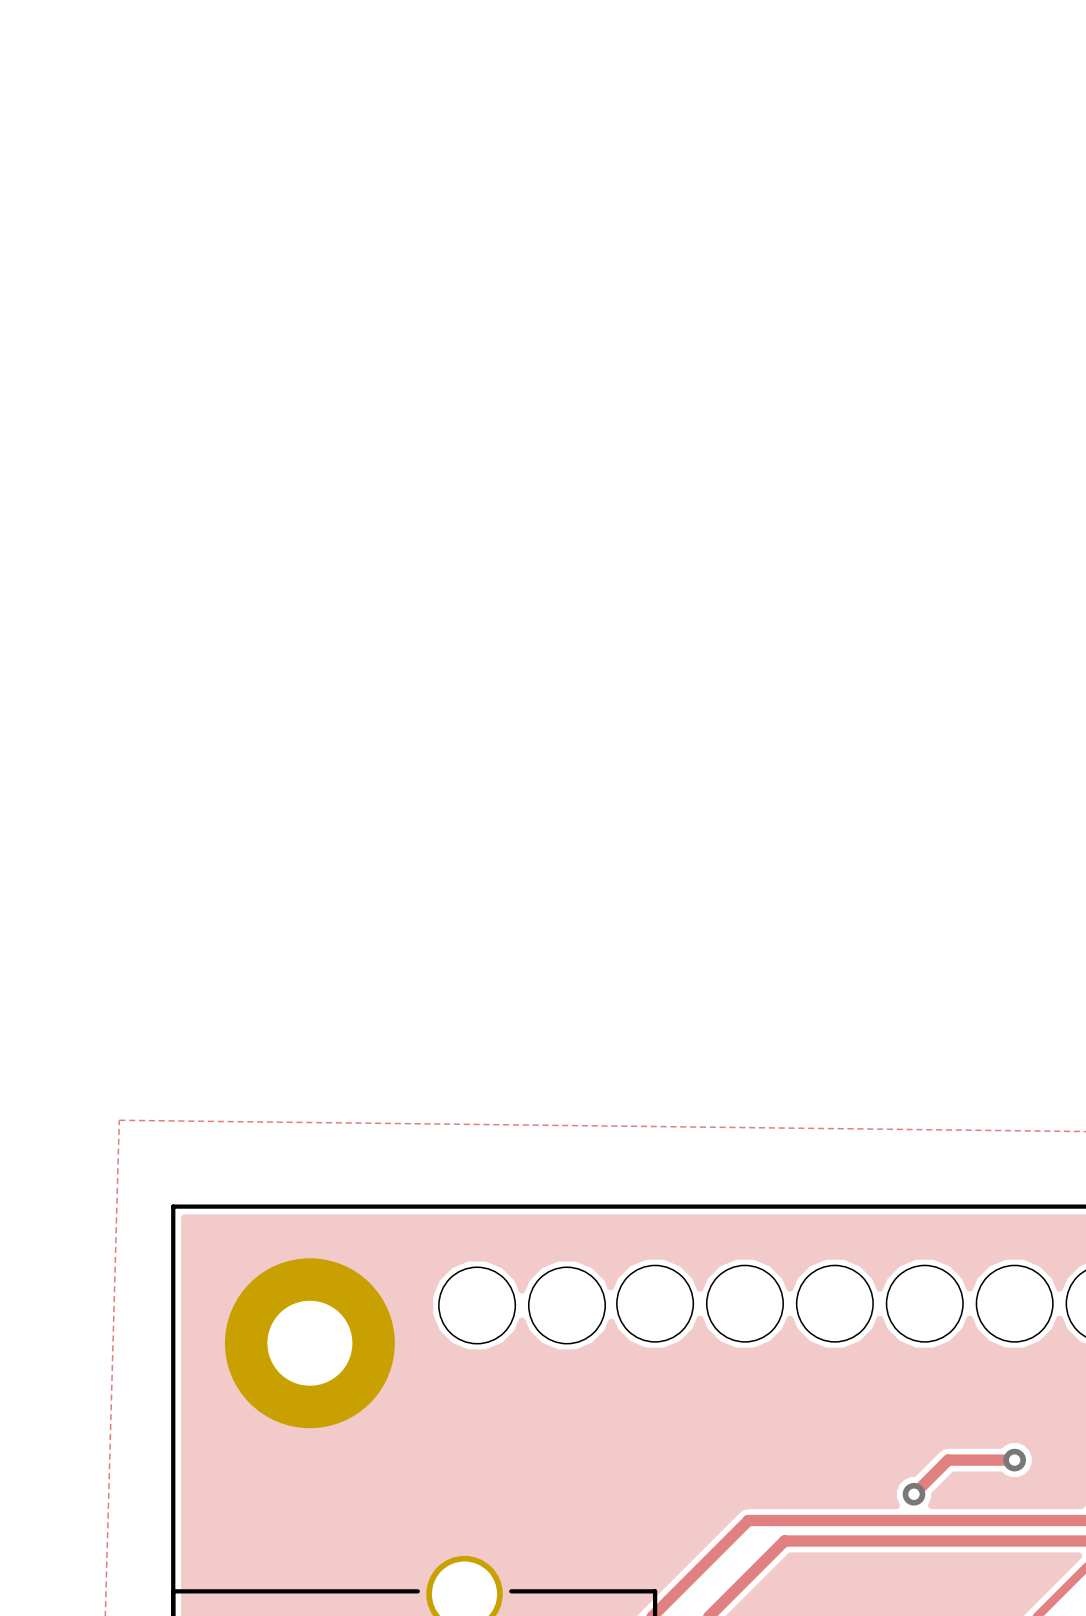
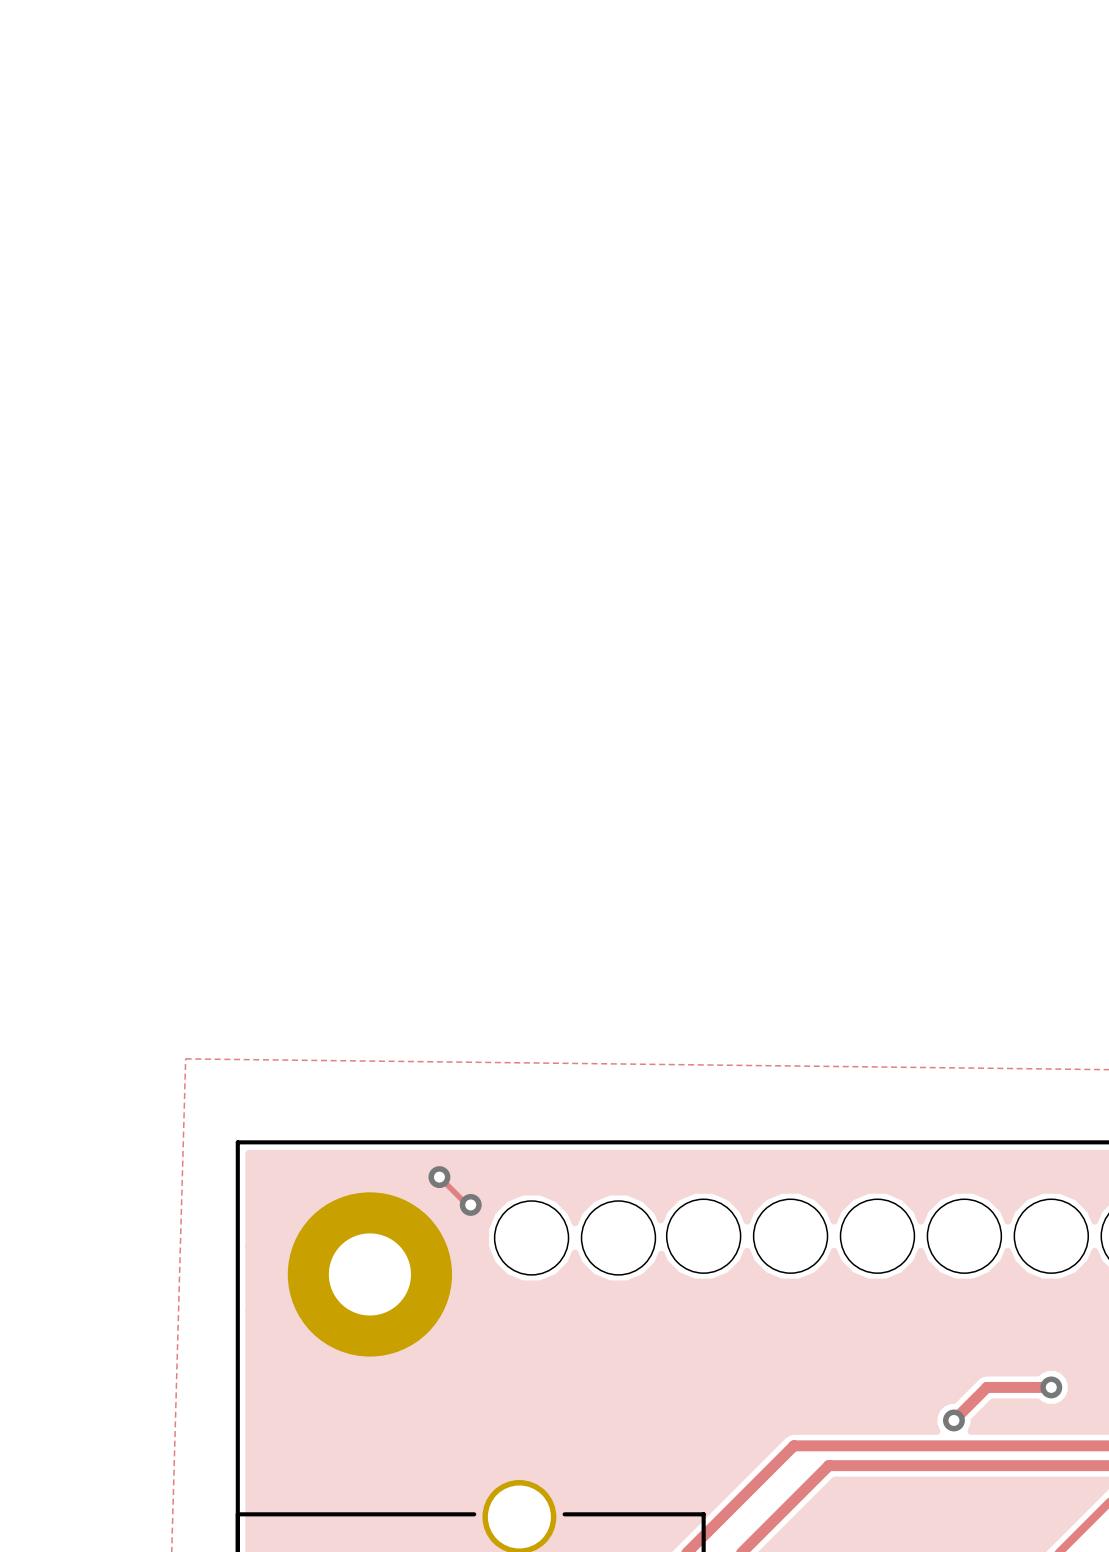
track: none -> (439, 1177) (467, 1204) (470, 1204)
via: none -> (439, 1177)
via: none -> (470, 1204)

